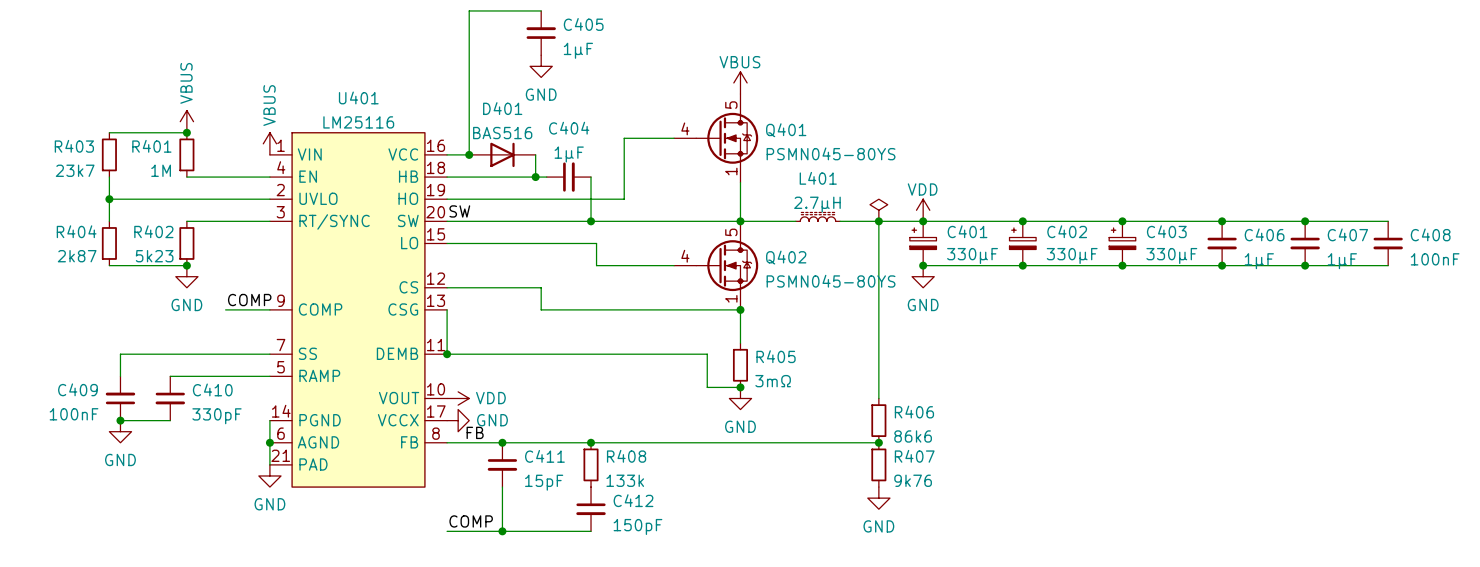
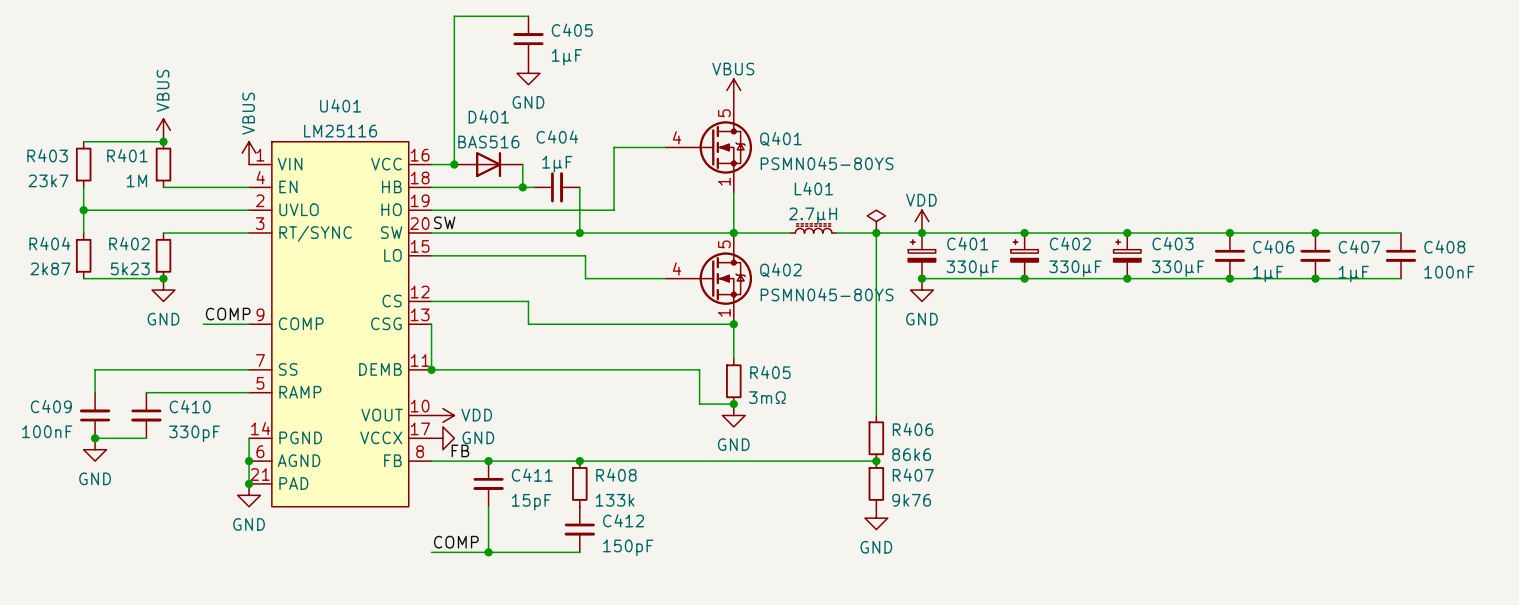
junction: none -> (249, 483)

